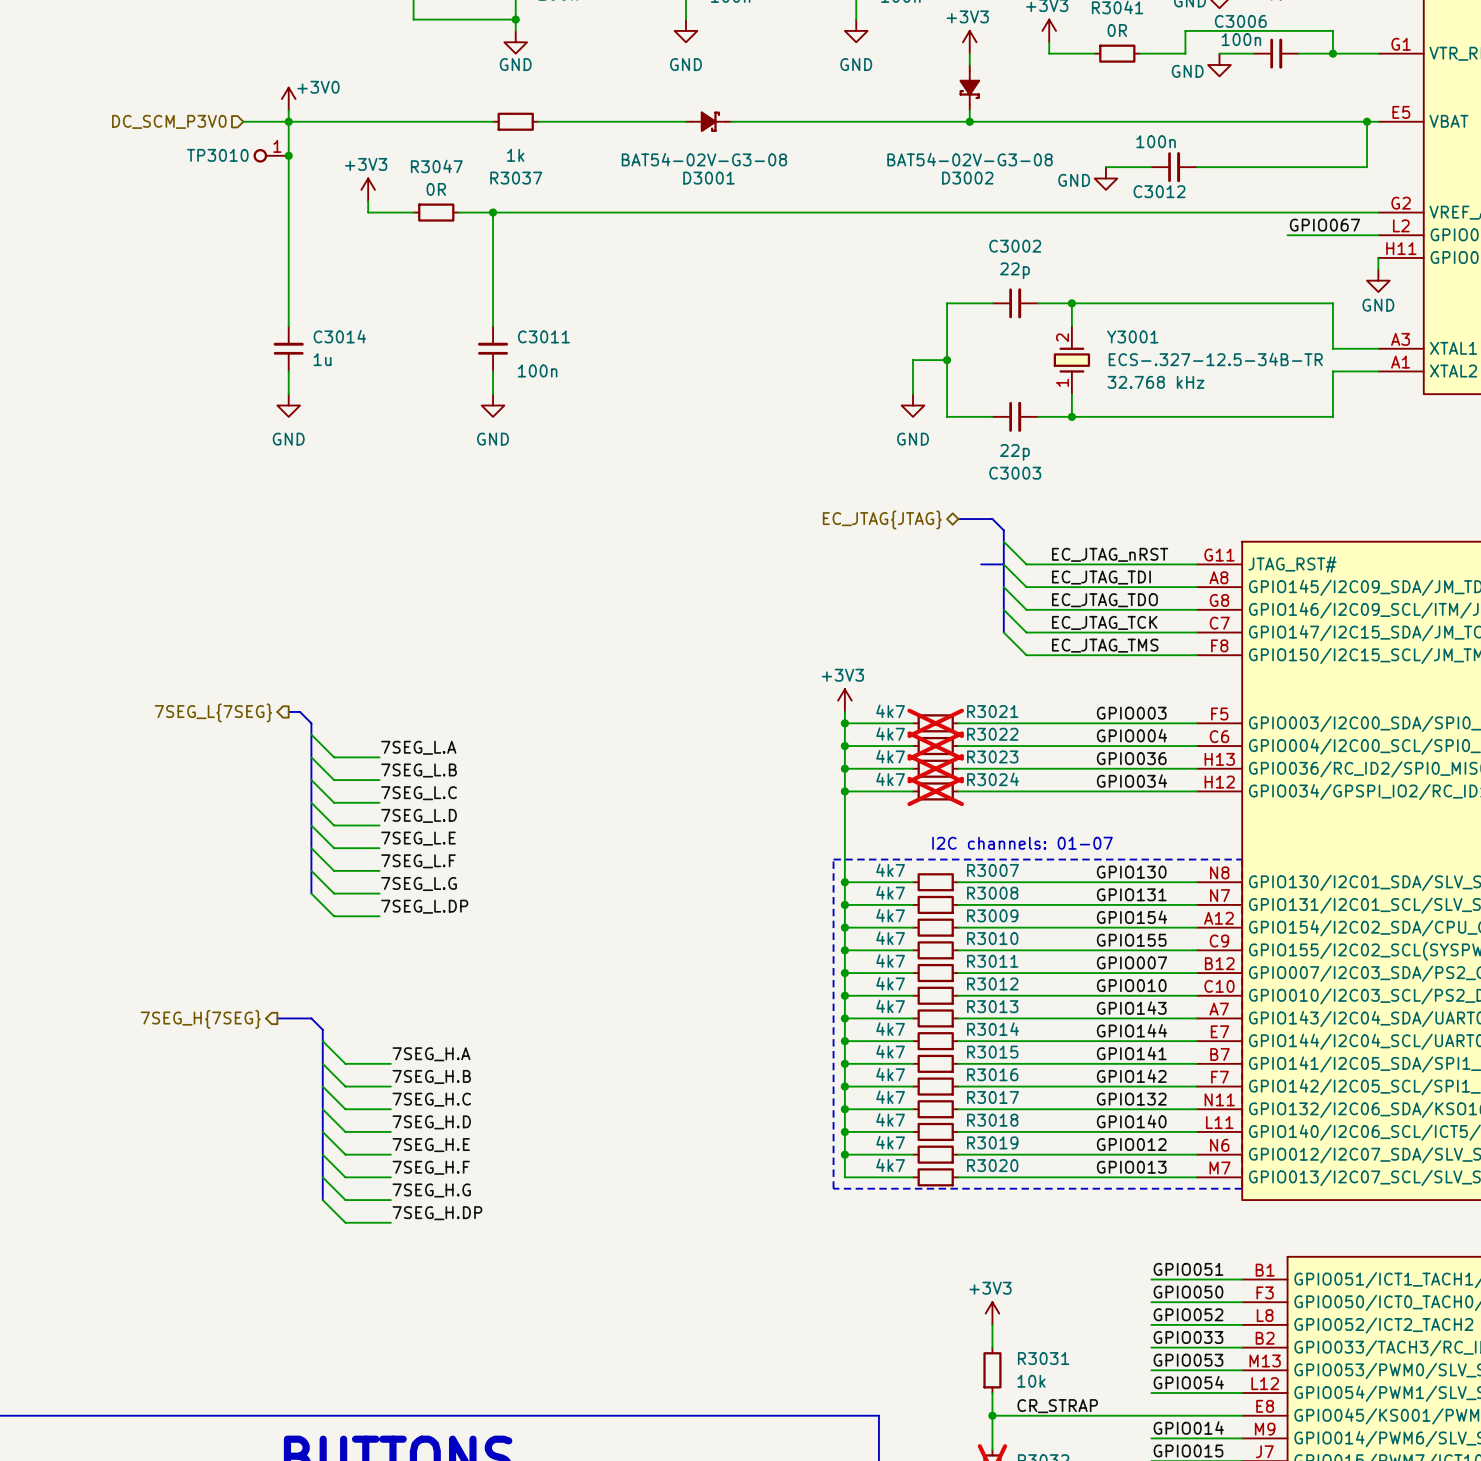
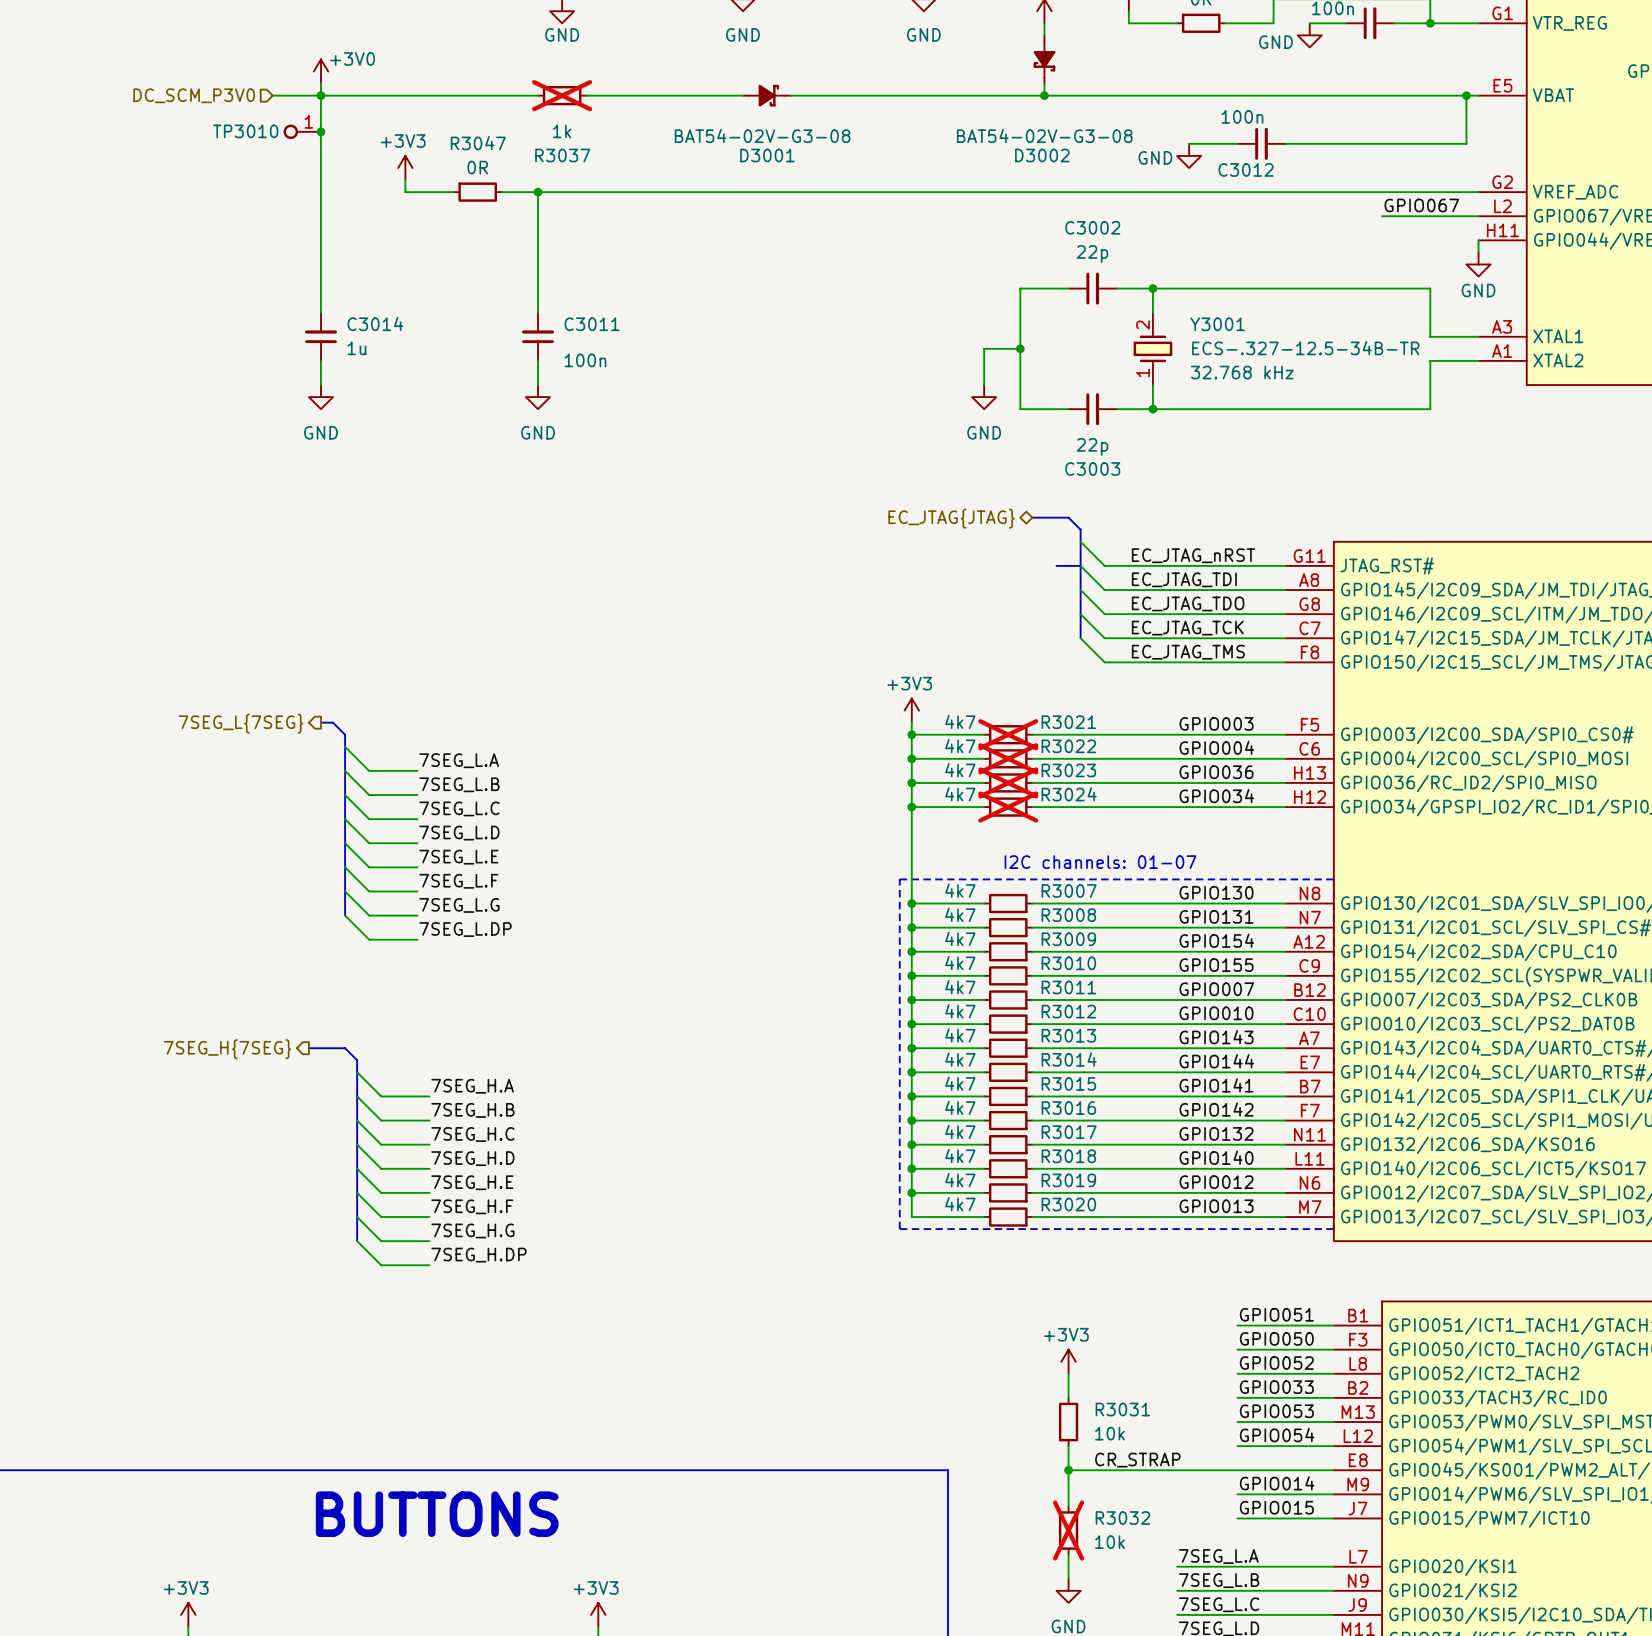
R3037 do-not-place cross: none -> (562, 95)

